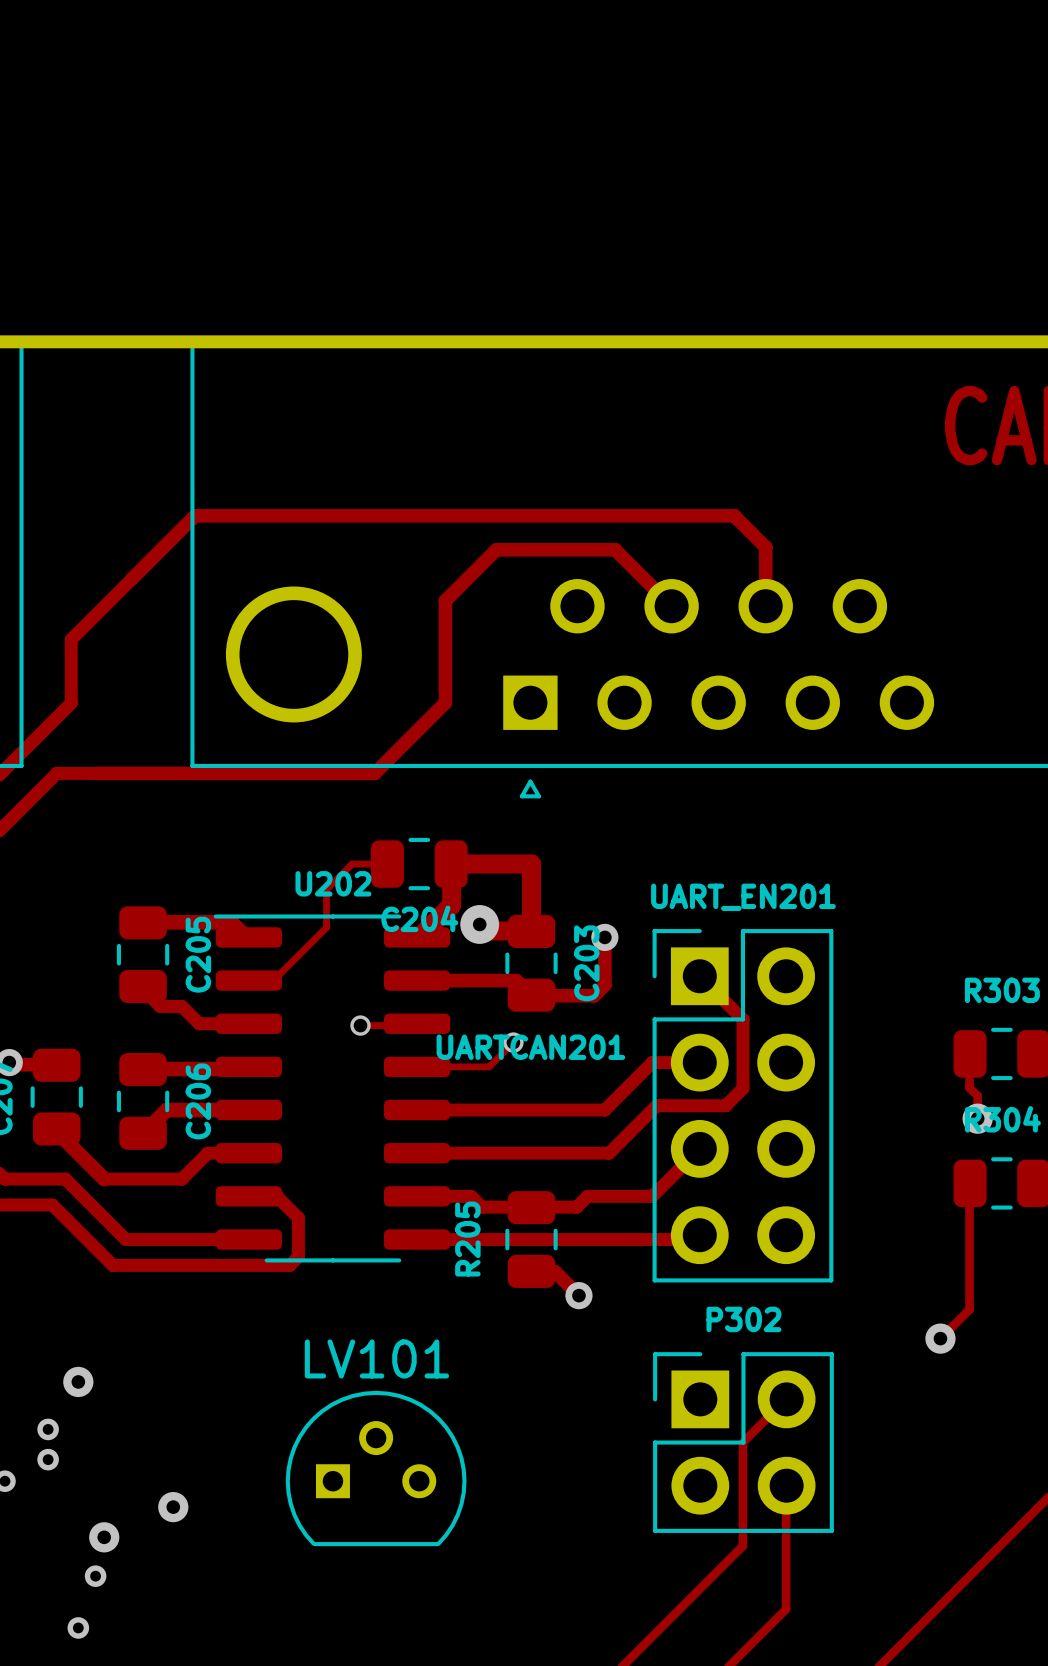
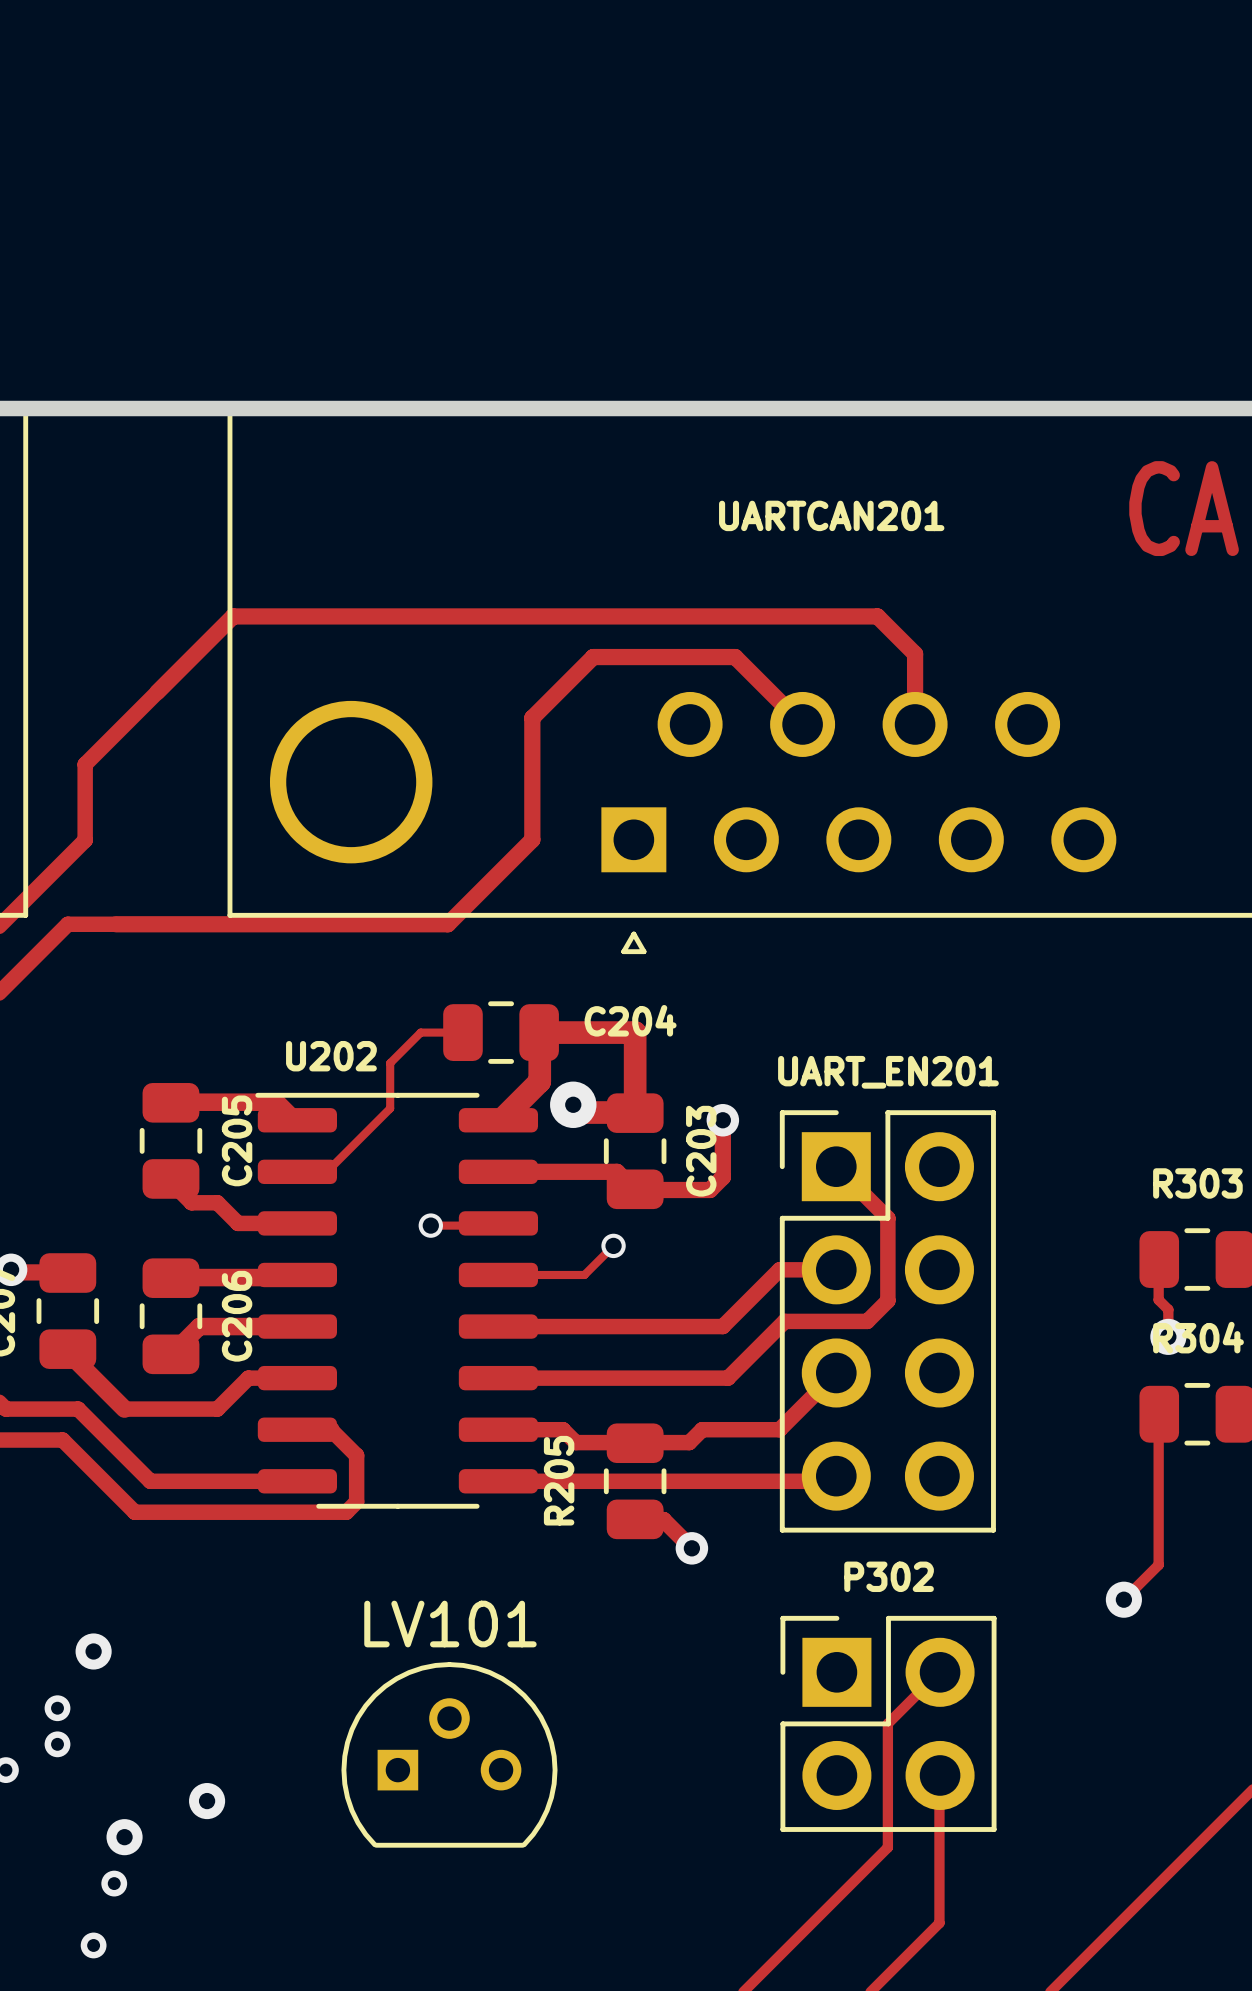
U202 name position: U202 (333, 883) -> U202 (331, 1056)
C204 name position: C204 (419, 918) -> C204 (630, 1020)
UARTCAN201 name position: UARTCAN201 (530, 1047) -> UARTCAN201 (831, 515)

